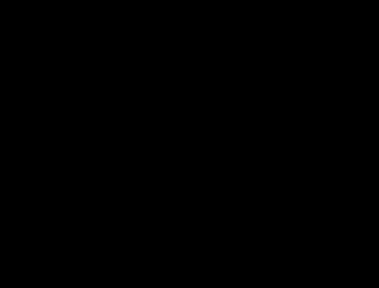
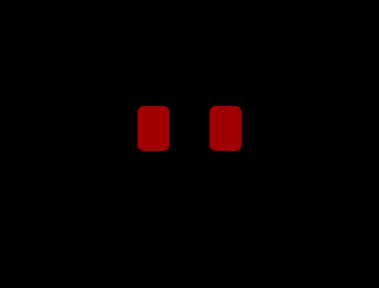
part: none -> (189, 128)

